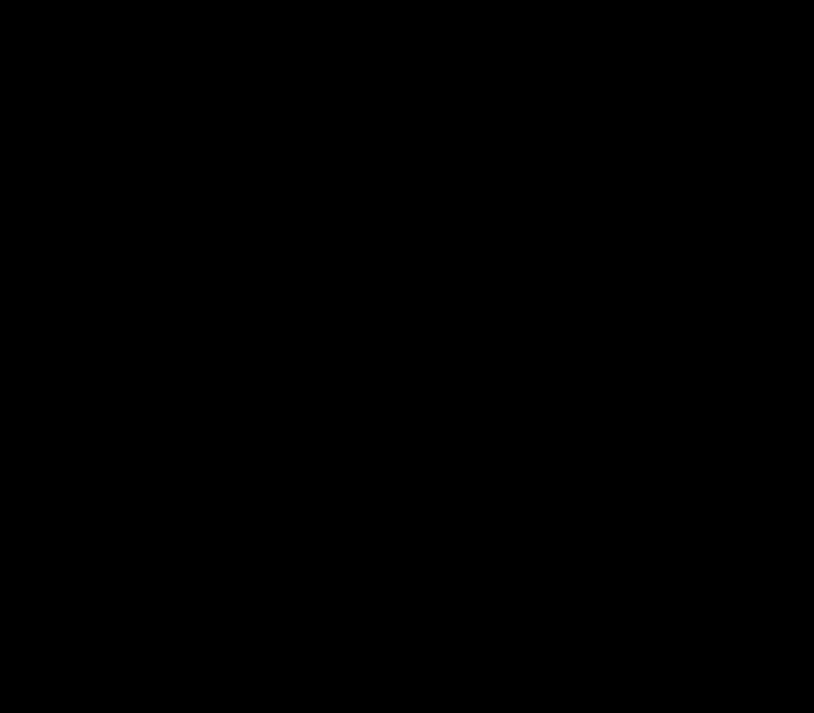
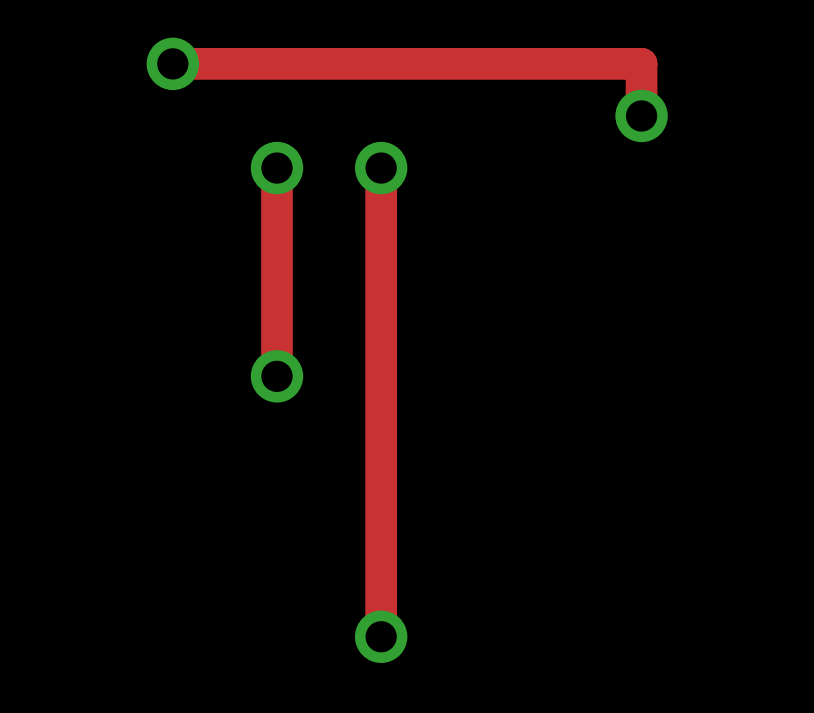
track: none -> (172, 63) (641, 63) (641, 115)
via: none -> (172, 63)
via: none -> (641, 115)
track: none -> (276, 168) (276, 376)
via: none -> (276, 168)
track: none -> (381, 168) (381, 636)
via: none -> (381, 168)
via: none -> (276, 376)
via: none -> (381, 636)

